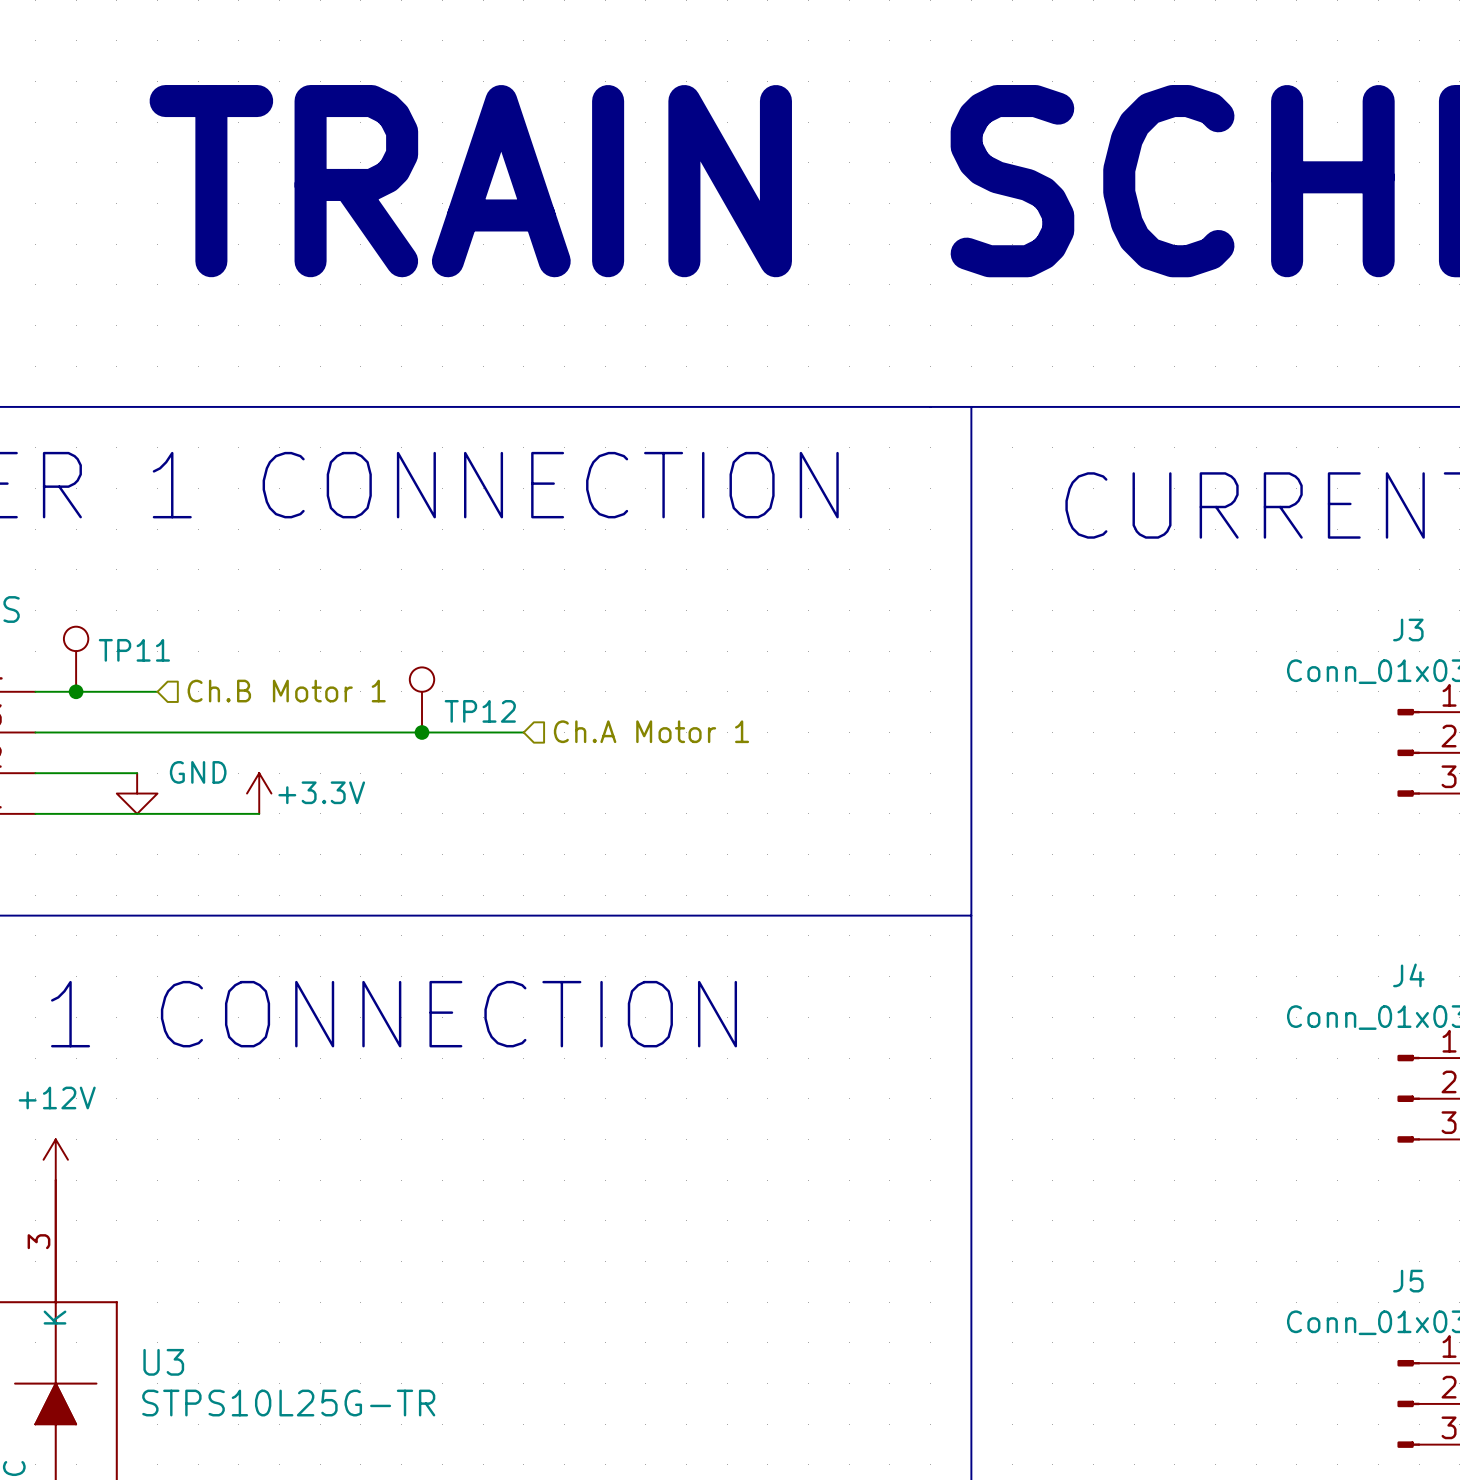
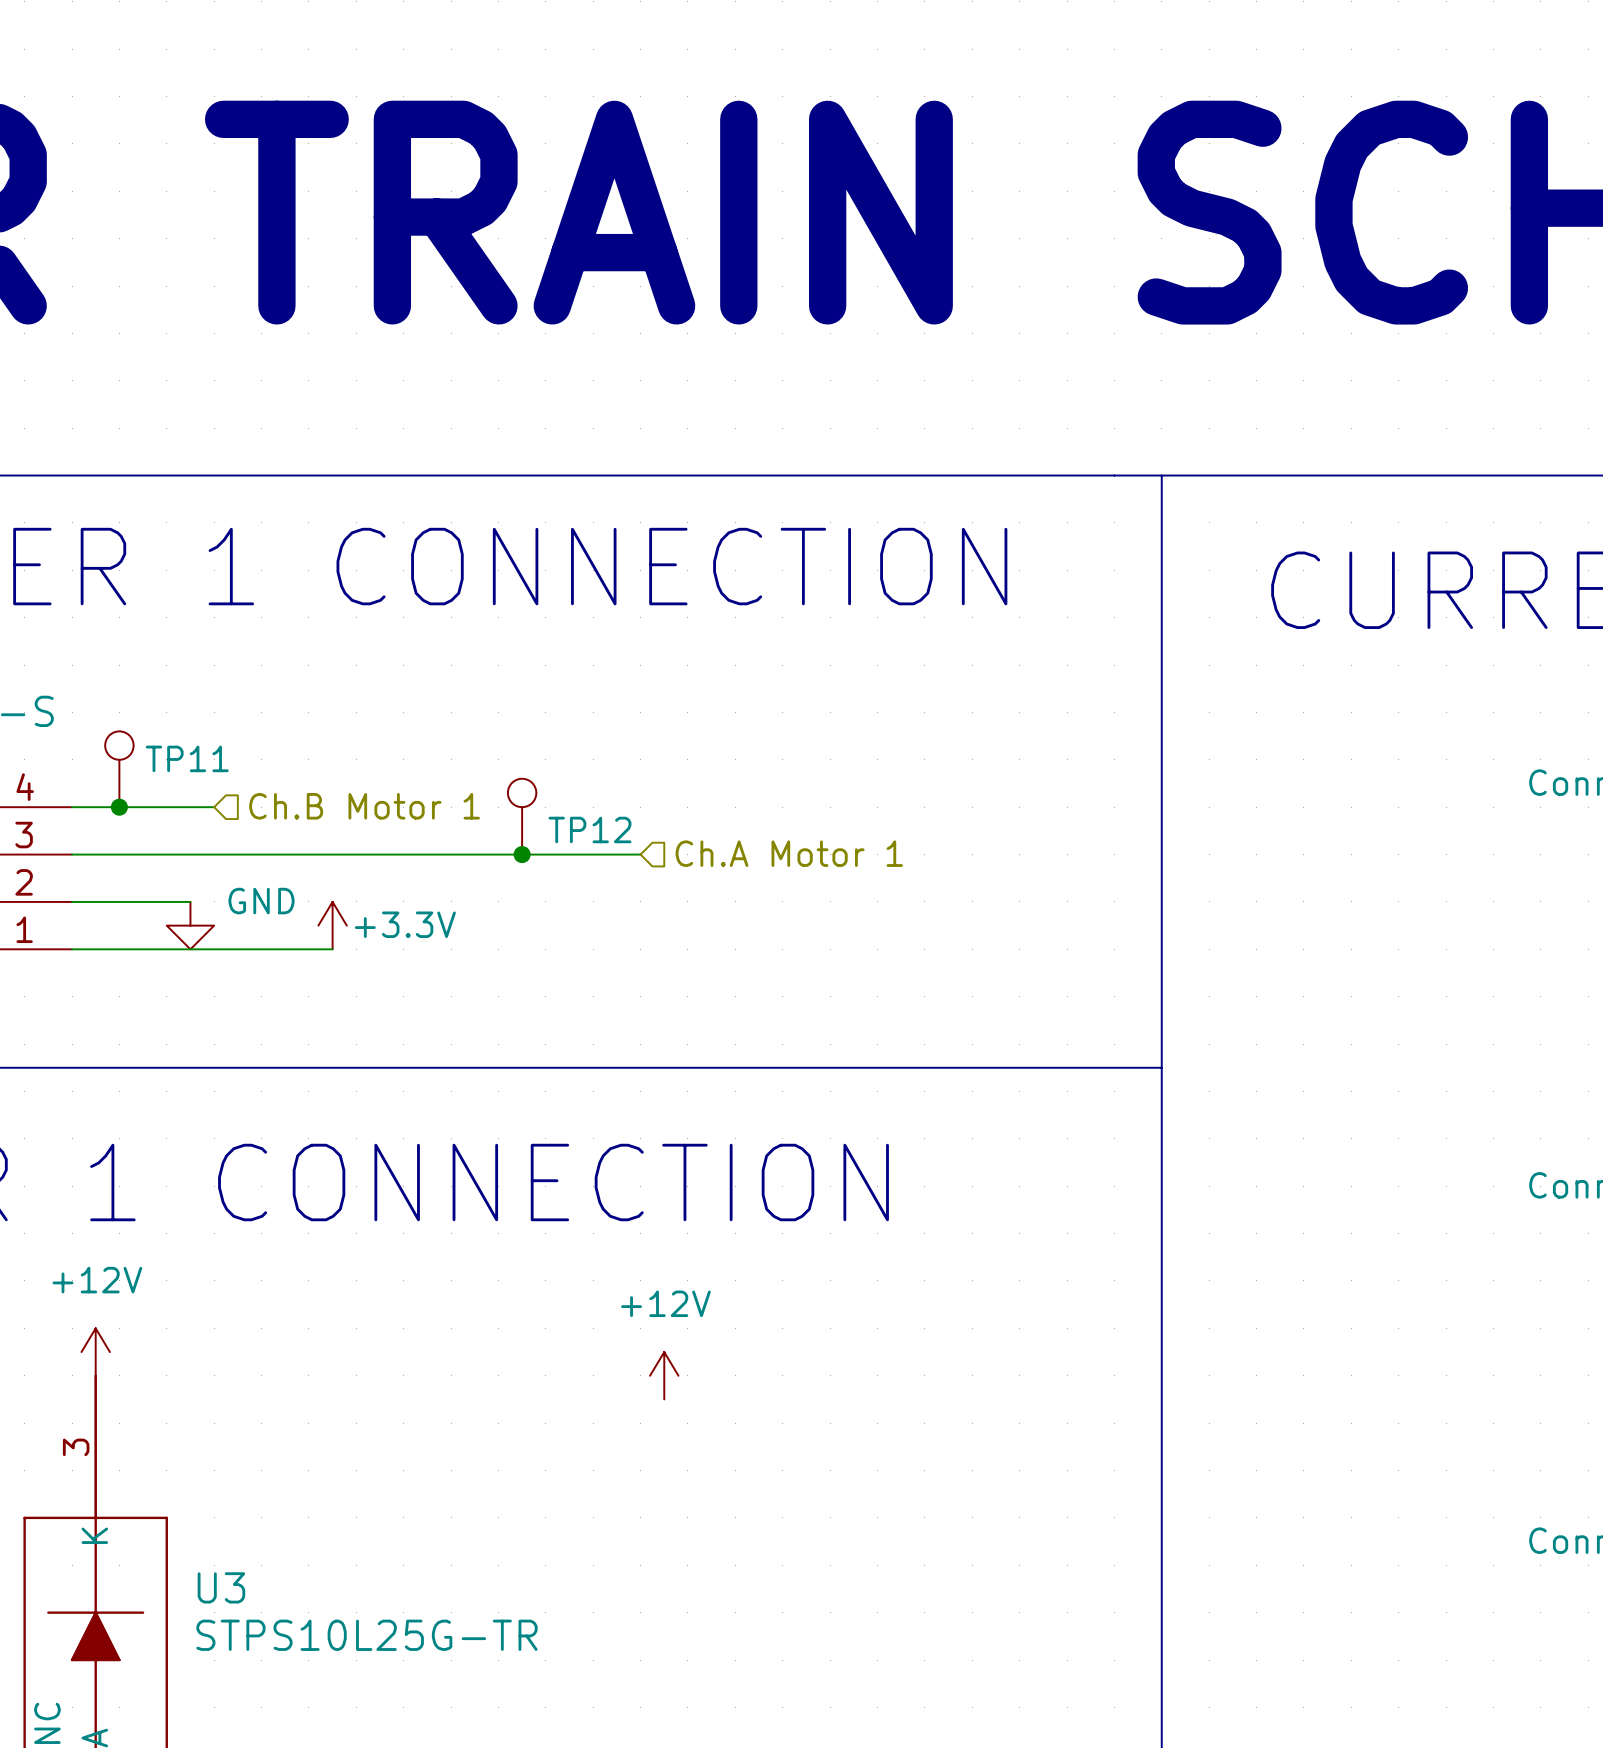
power symbol: none -> +12V (664, 1375)

